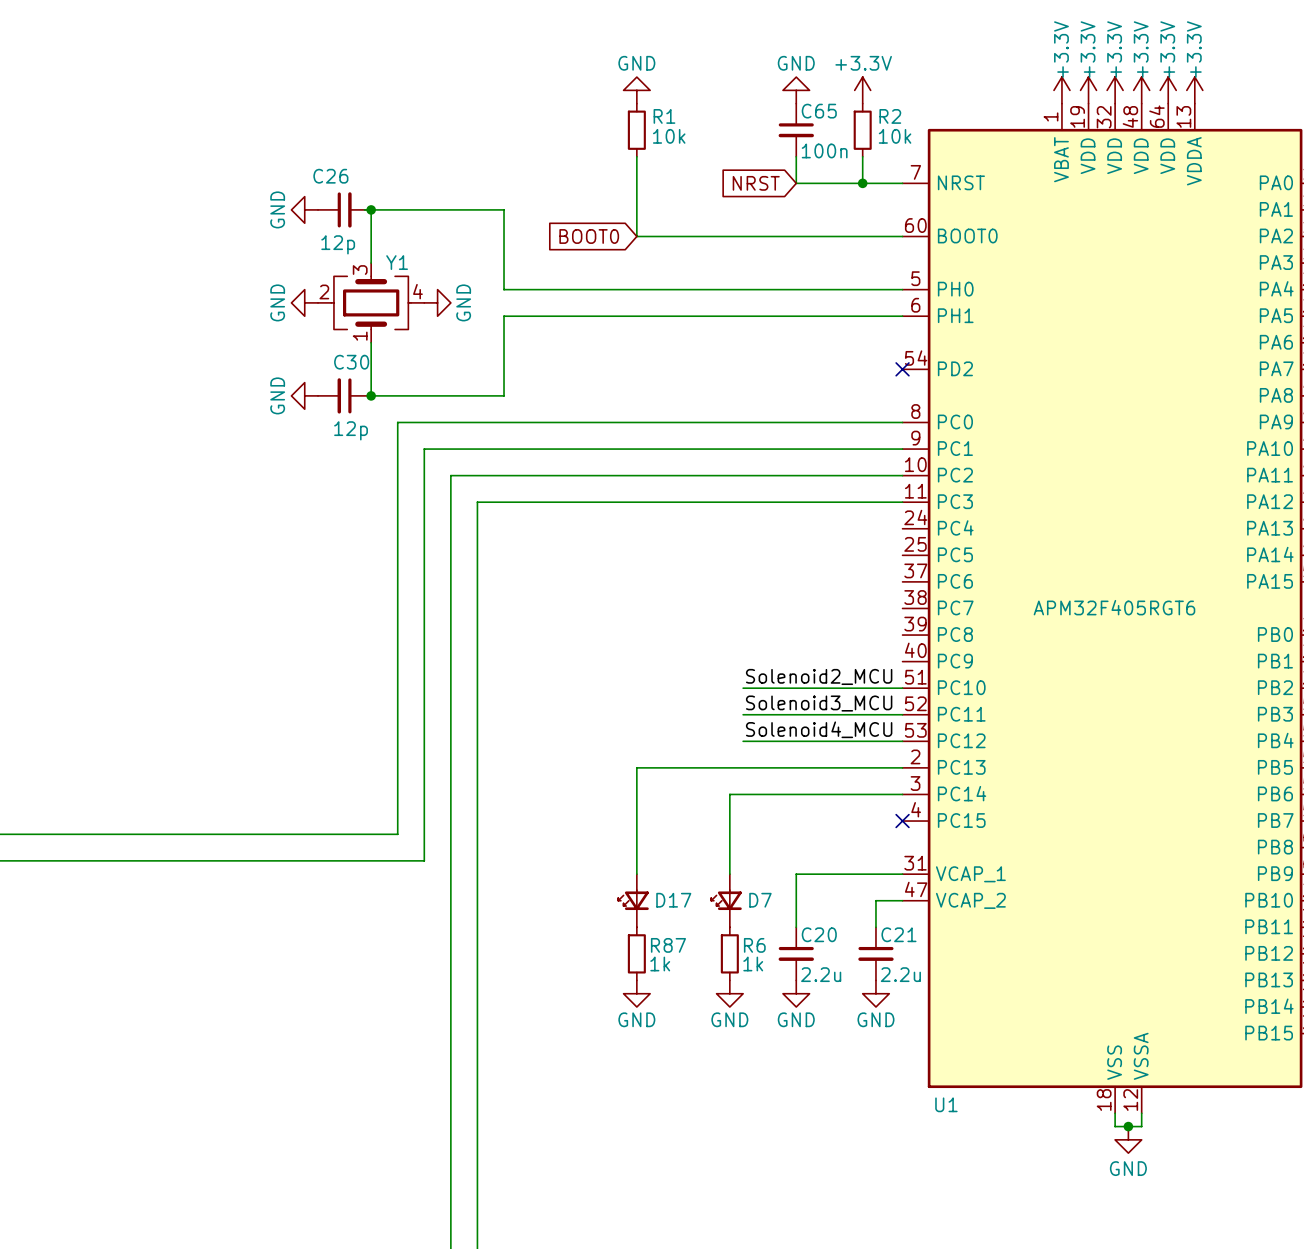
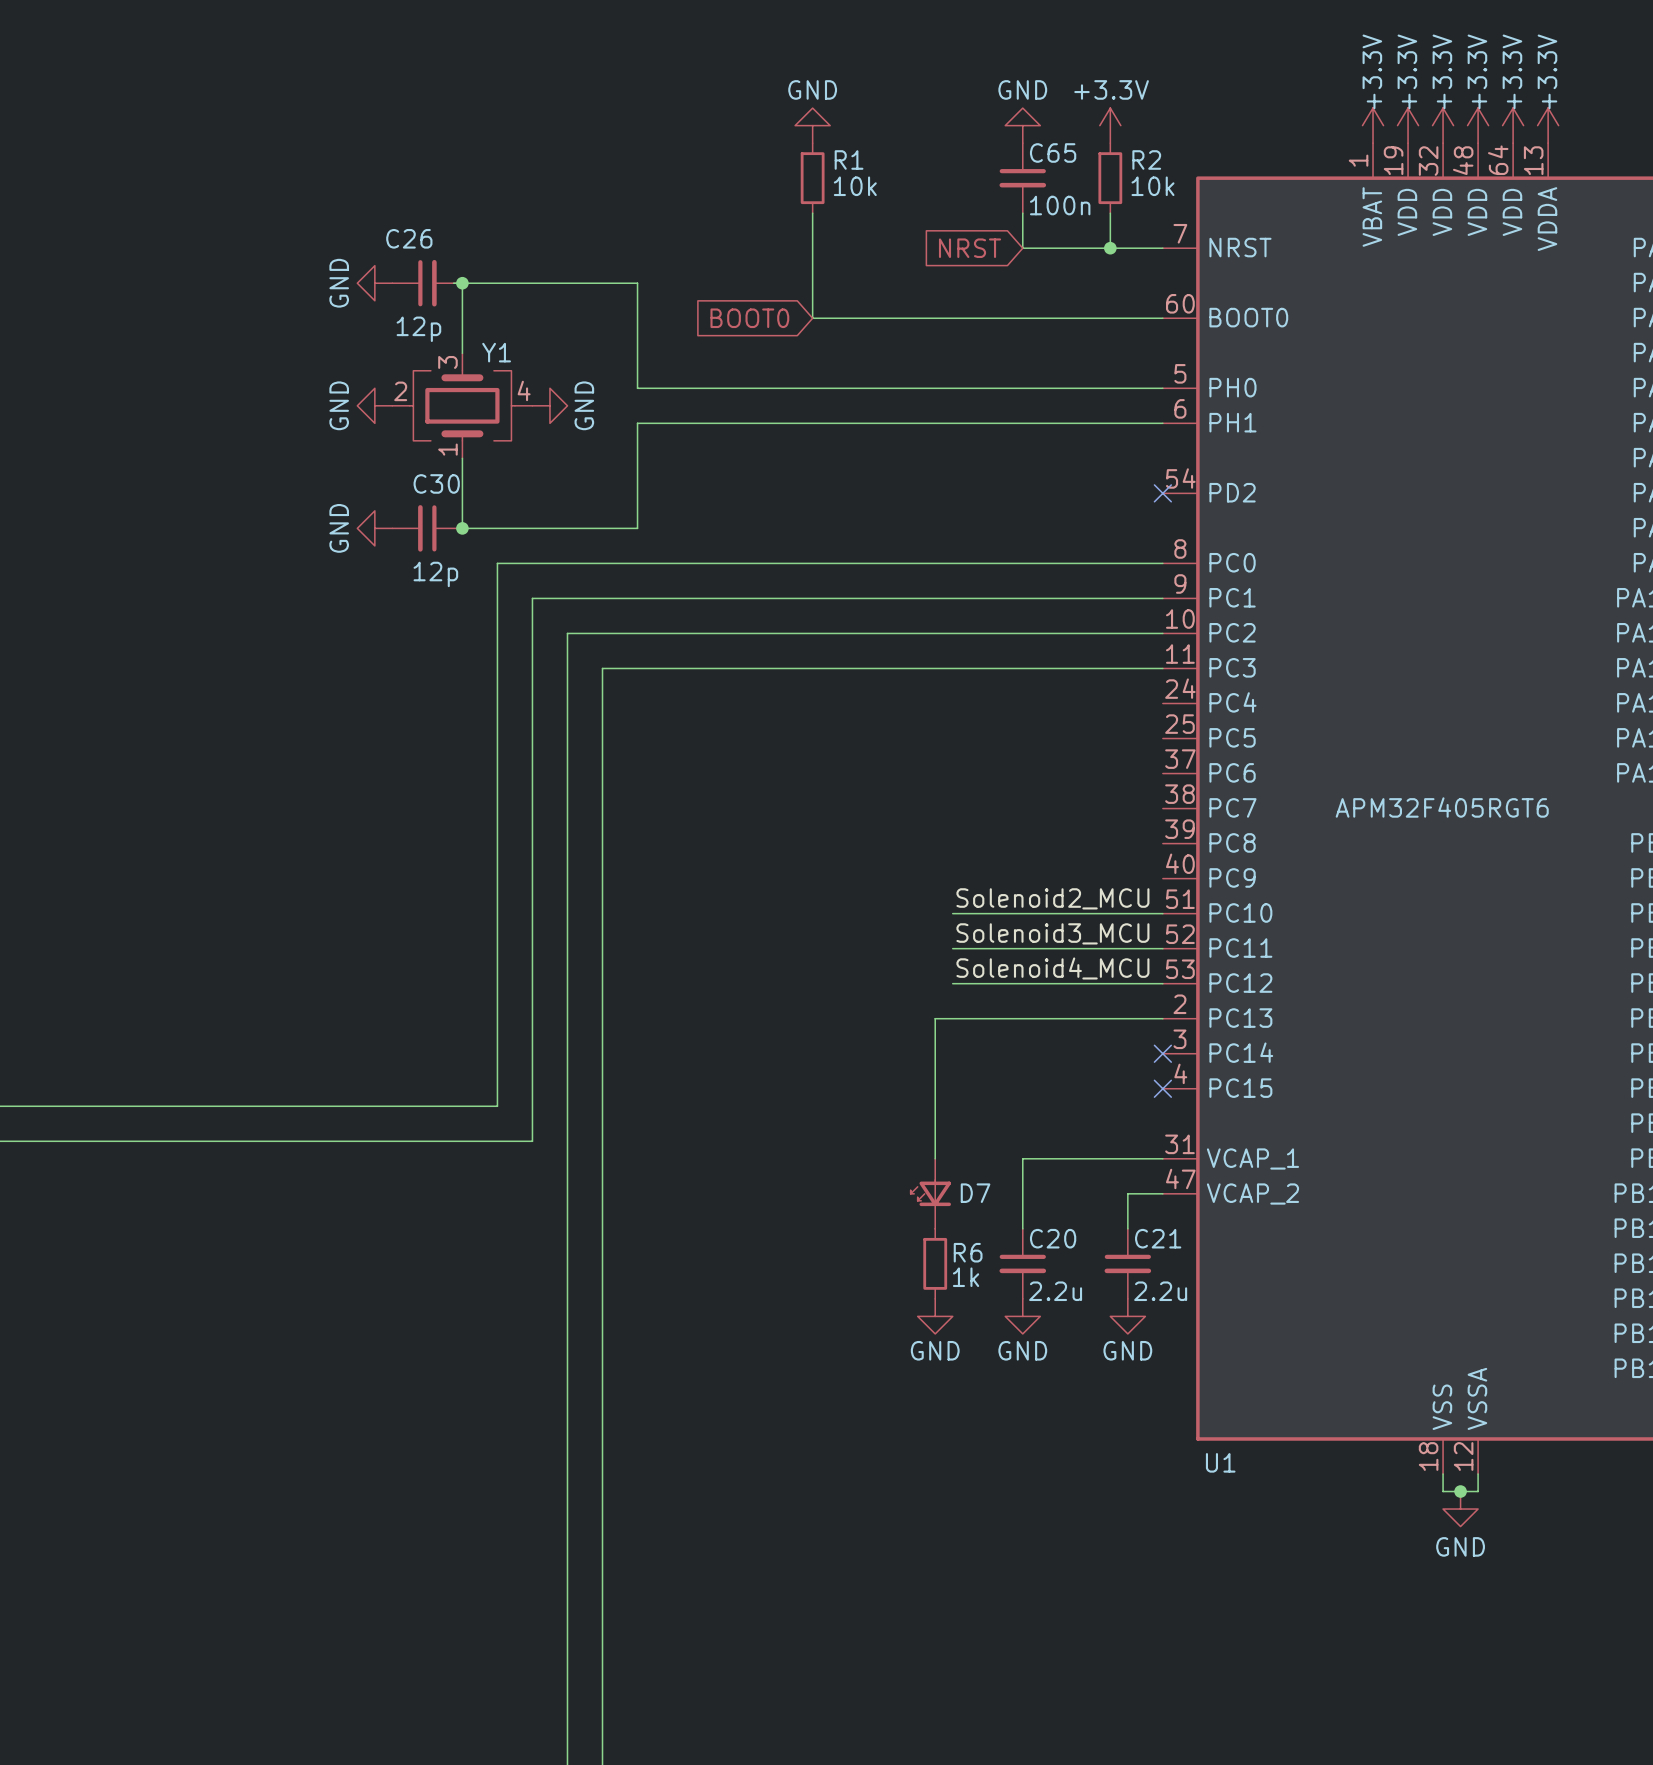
wire: (729, 767) (636, 767) (636, 874) -> (935, 1018) (935, 1053)
wire: (729, 794) (902, 794) -> none
no-connect mark: none -> (1162, 1053)
D17: (633, 900) -> none
R87: 1k (636, 953) -> none
power symbol: GND (636, 993) -> none

